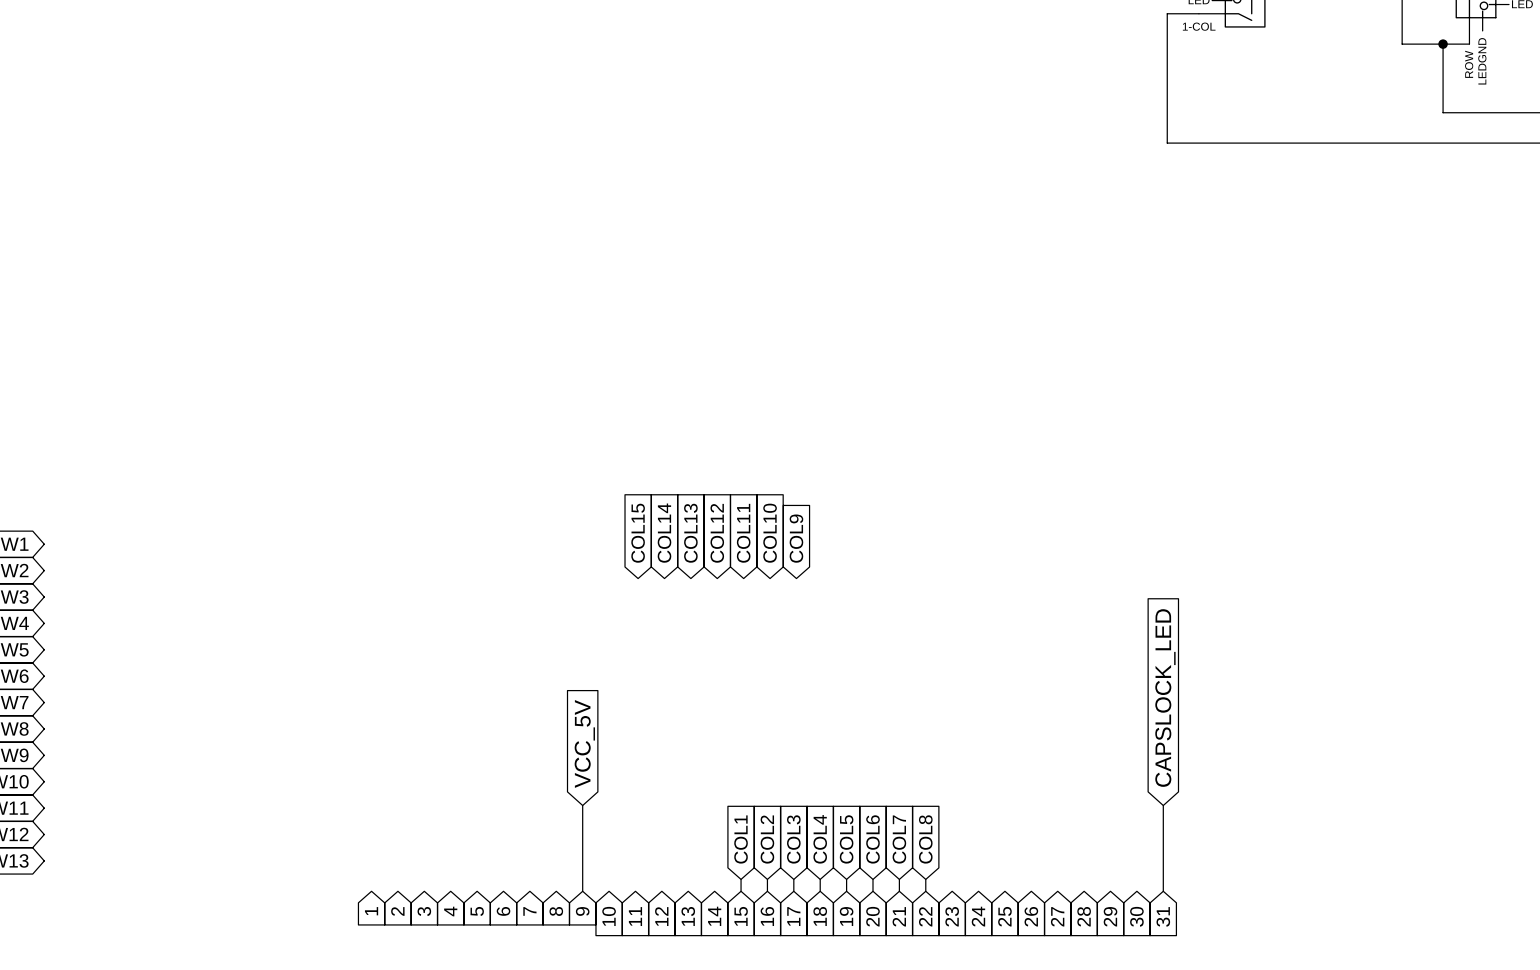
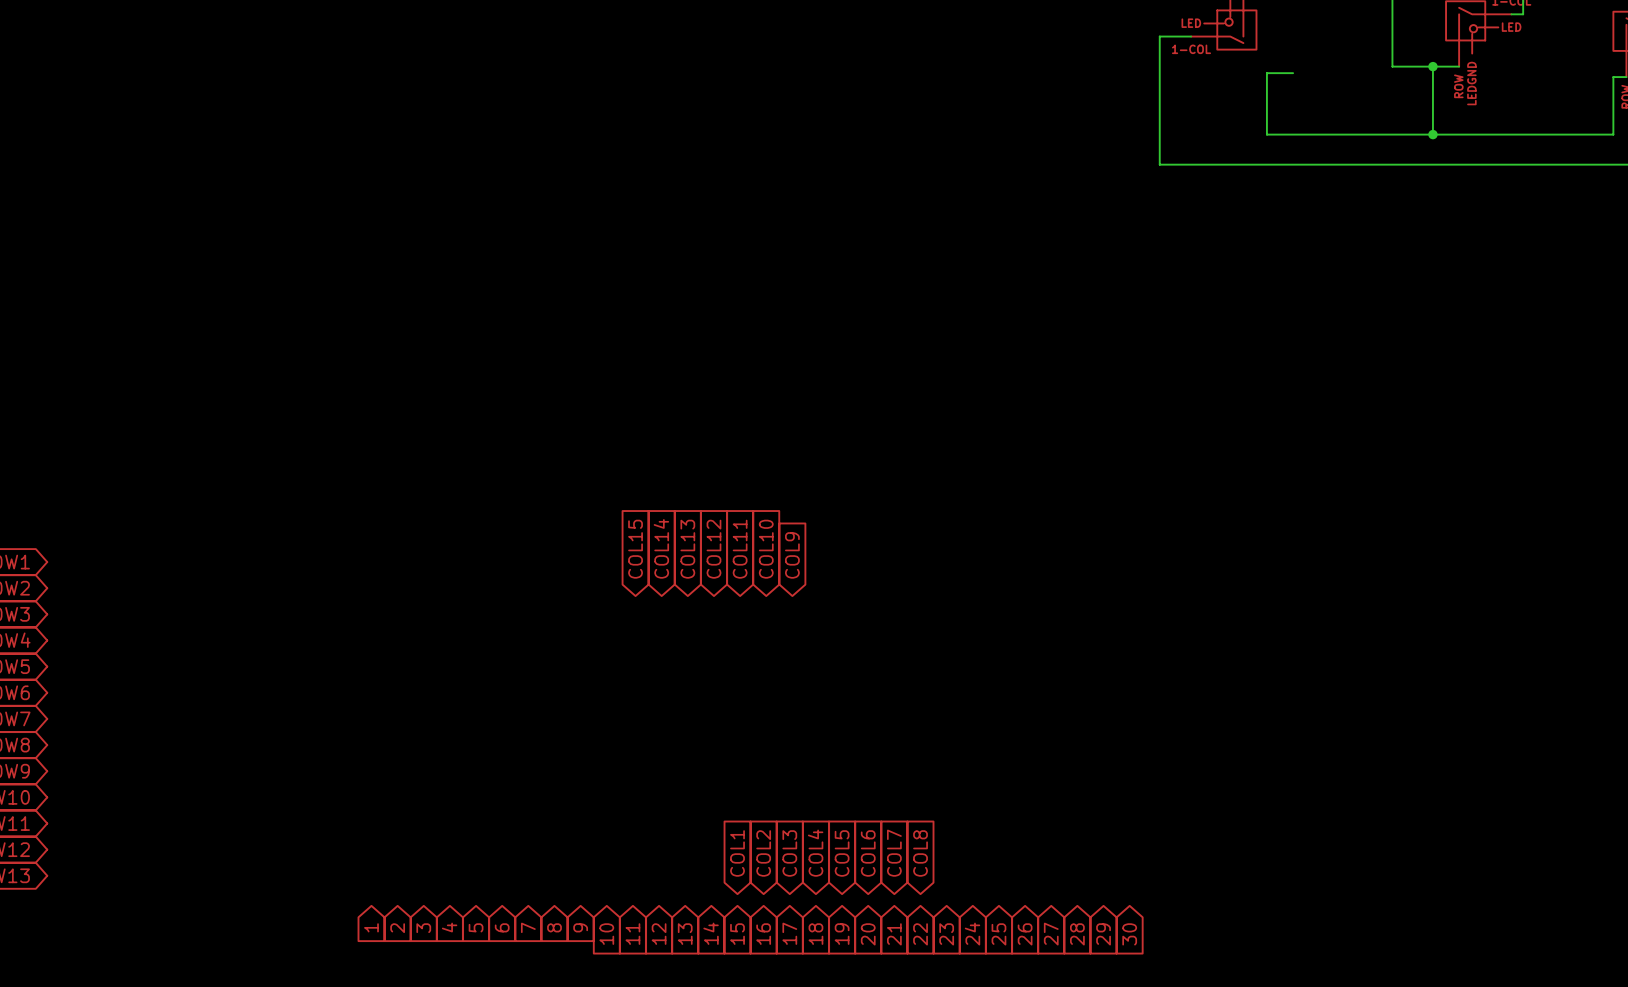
wire: none -> (1293, 73) (1266, 73) (1266, 134) (1432, 134)
junction: none -> (1432, 134)
global label: CAPSLOCK_LED (1165, 698) -> none
global label: VCC_5V (584, 743) -> none
wire: (582, 805) (582, 891) -> none
wire: (1163, 805) (1163, 891) -> none
wire: (741, 879) (741, 891) -> none
wire: (767, 879) (767, 891) -> none
wire: (793, 879) (793, 891) -> none
wire: (820, 879) (820, 891) -> none
wire: (846, 879) (846, 891) -> none
wire: (873, 879) (873, 891) -> none
wire: (899, 879) (899, 891) -> none
wire: (925, 879) (925, 891) -> none
global label: 31 (1163, 916) -> none

